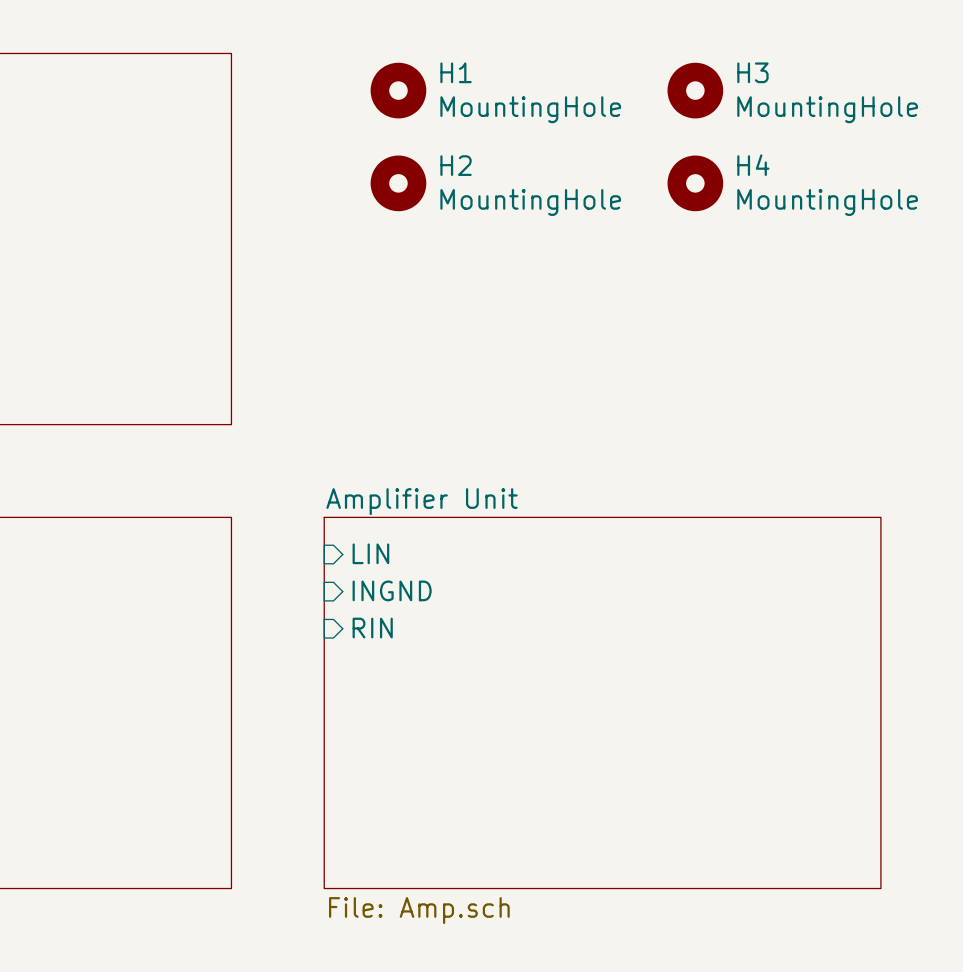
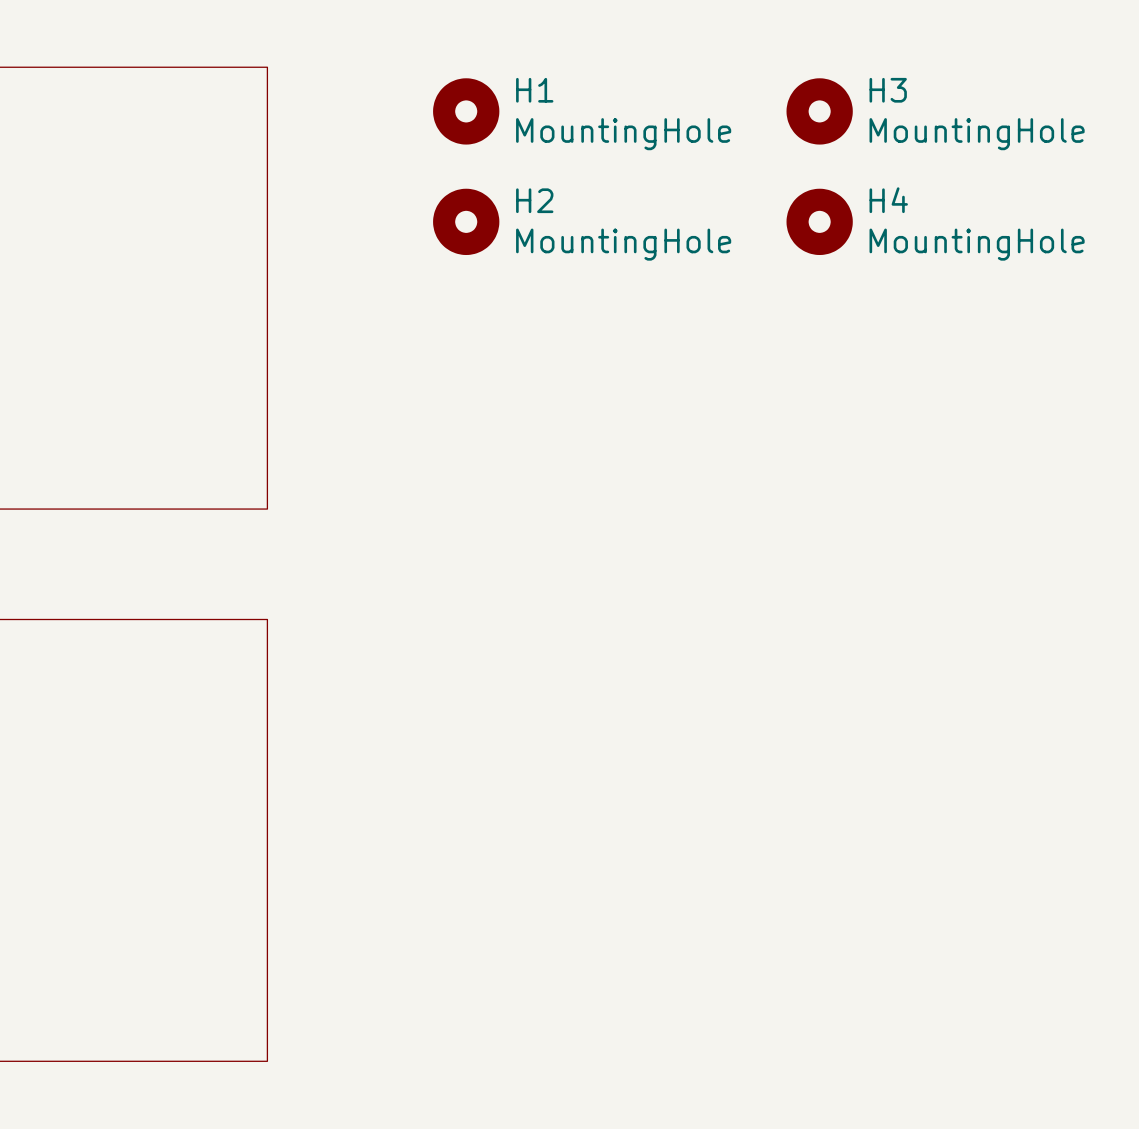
sheet pin: LIN (370, 553) -> none
sheet pin: INGND (392, 590) -> none
sheet pin: RIN (372, 628) -> none
sheet Amplifier Unit: File: Amp.sch (602, 702) -> none

